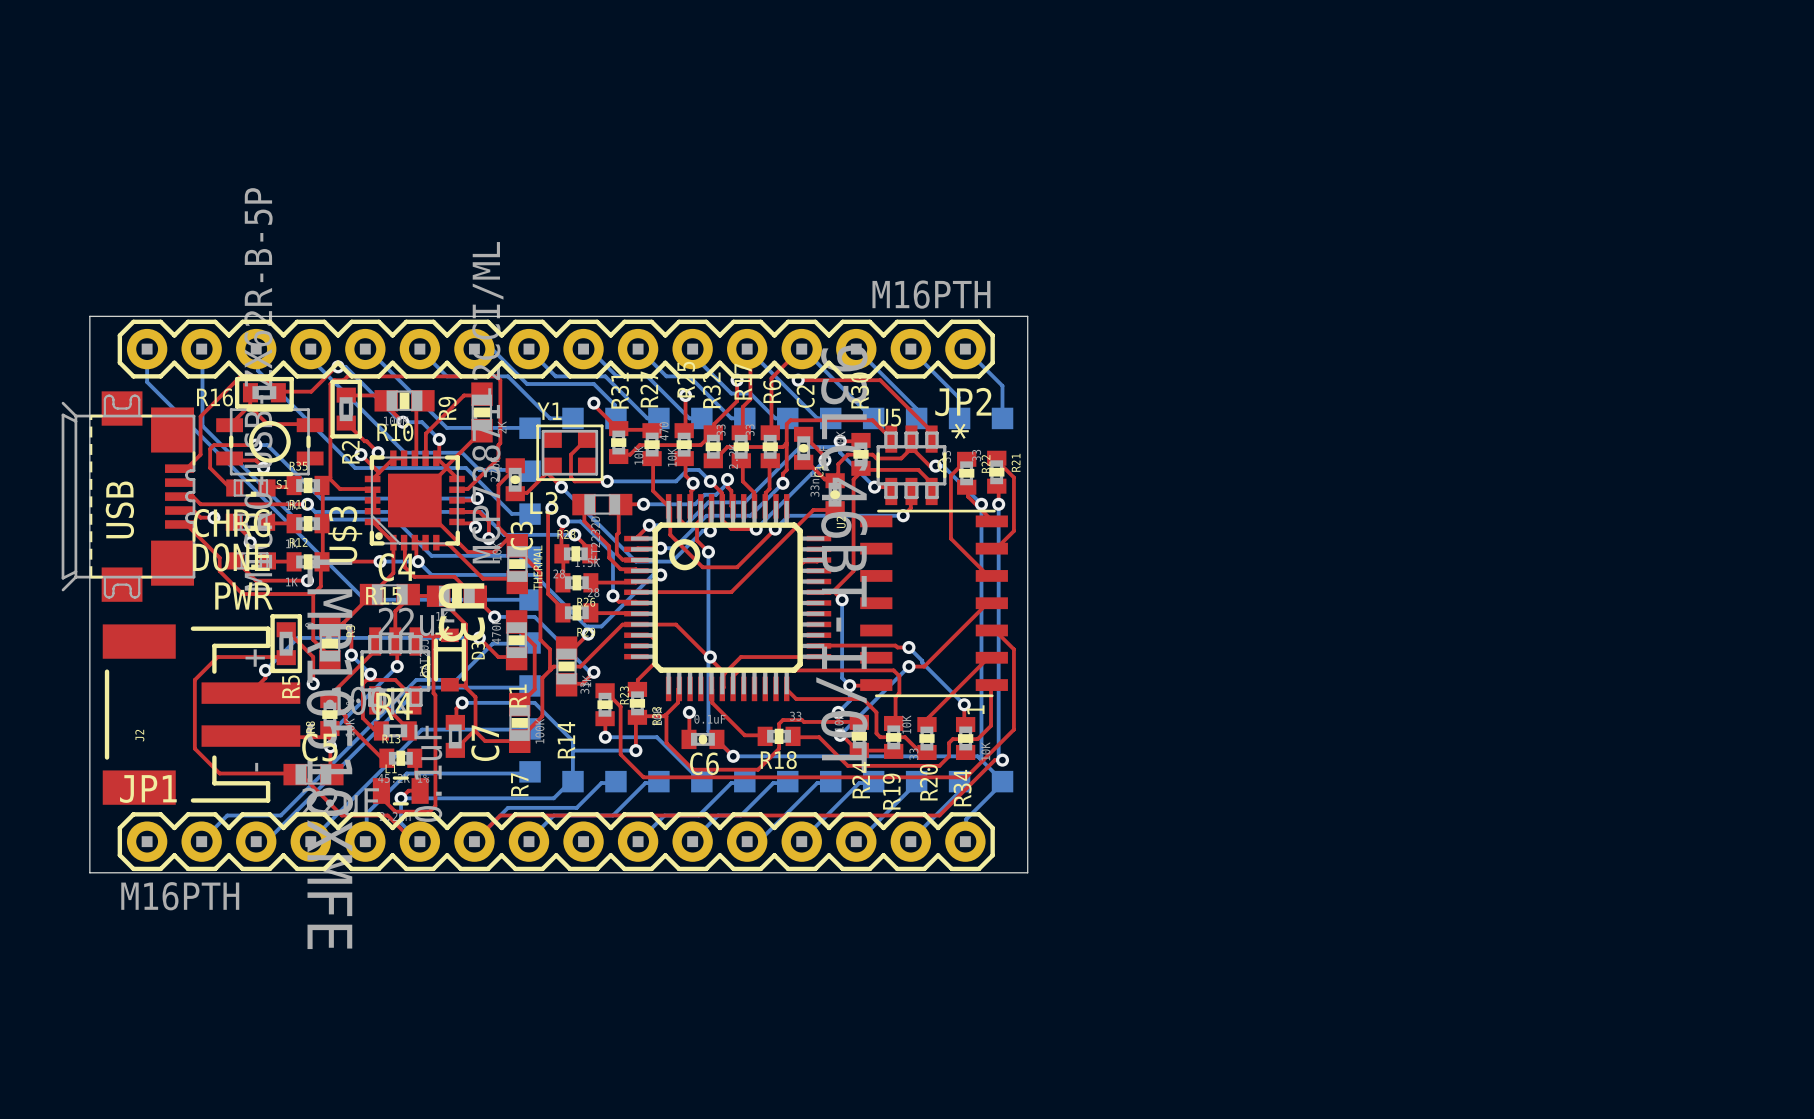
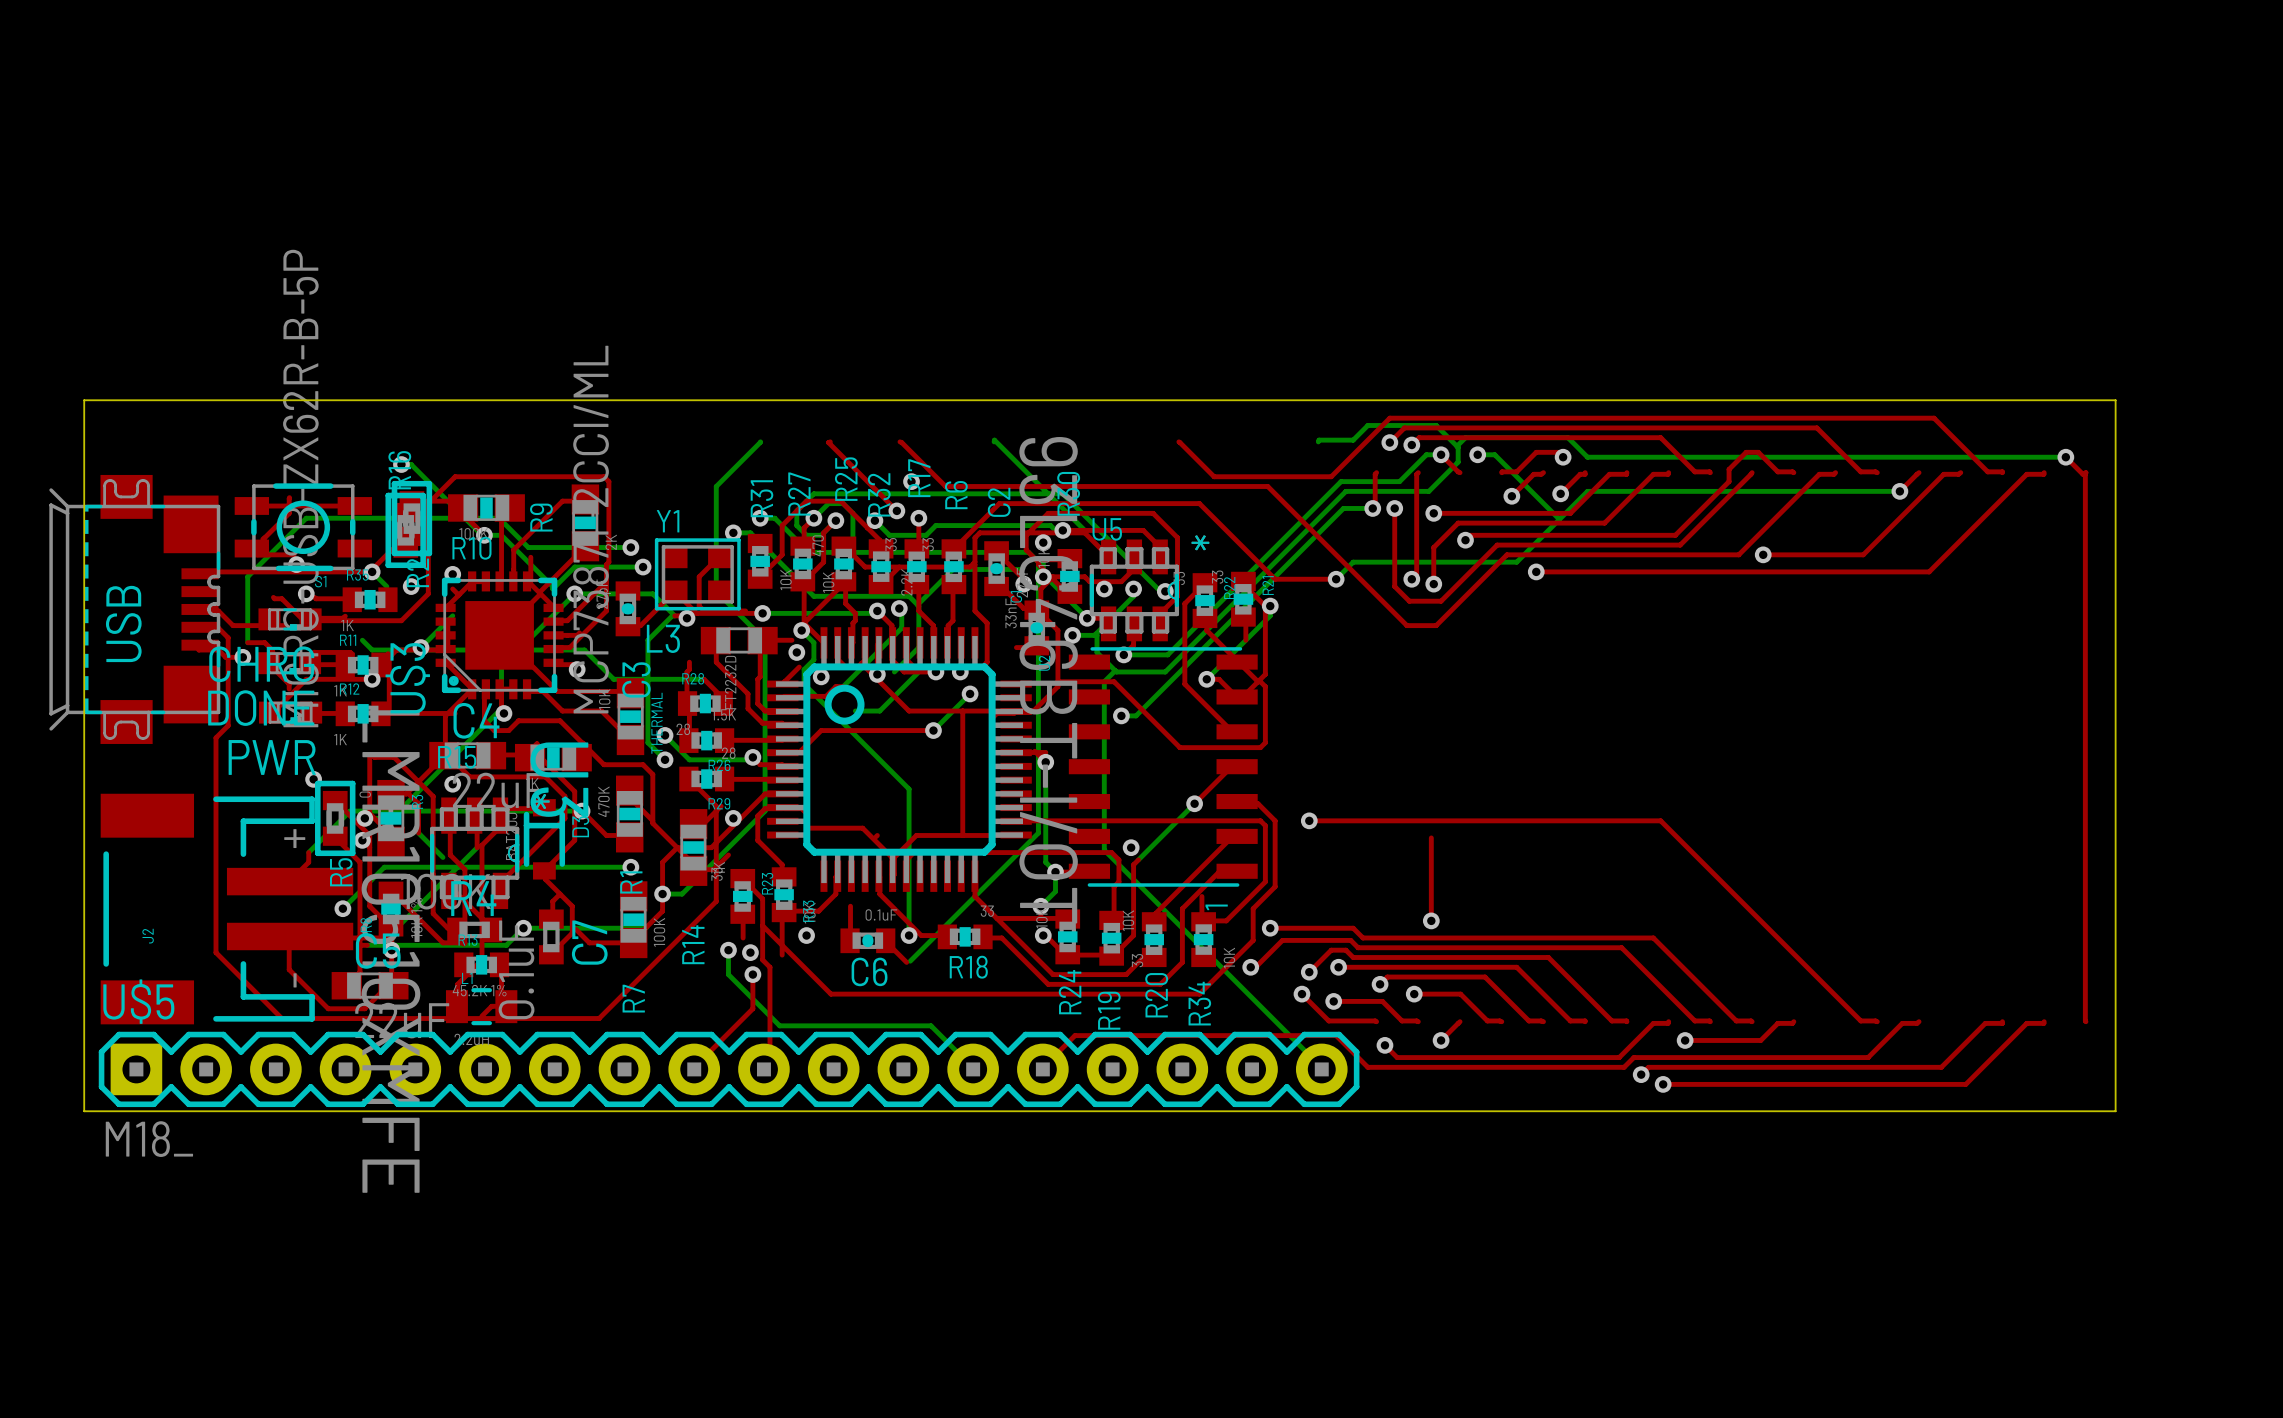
board edge: (89, 316) (1027, 316) (1027, 872) -> (84, 400) (2115, 400) (2115, 1111) (1282, 1111)
bottom track: (147, 349) (147, 382) (364, 599) (530, 600) -> none
bottom track: (201, 349) (202, 426) (296, 519) (395, 519) (431, 555) (530, 557) -> none
bottom track: (256, 349) (257, 349) (257, 370) (355, 468) (465, 468) (511, 513) (530, 514) -> none
bottom track: (310, 349) (311, 359) (404, 452) (462, 452) (479, 469) (530, 471) -> none
bottom track: (365, 349) (366, 347) (446, 427) (530, 428) -> none
bottom track: (419, 349) (446, 376) (507, 376) (549, 418) (572, 418) -> none
bottom track: (474, 349) (492, 349) (527, 384) (593, 384) (614, 405) (615, 418) -> none
bottom track: (528, 349) (555, 376) (605, 376) (647, 418) (658, 418) -> none
JP2: M16PTH (556, 349) -> none
bottom track: (583, 349) (590, 349) (616, 376) (647, 376) (689, 418) (701, 418) -> none
bottom track: none -> (760, 441) (716, 486) (716, 591) (765, 640) (765, 811) (682, 894) (662, 894)
bottom track: (638, 349) (666, 376) (689, 376) (731, 418) (744, 418) -> none
top track: none -> (830, 441) (828, 442) (896, 510)
bottom track: (692, 349) (693, 355) (731, 393) (750, 393) (775, 418) (787, 418) -> none
top track: none -> (900, 441) (945, 486) (1267, 486) (1406, 625) (1436, 625) (1506, 554) (1738, 554) (1819, 474) (1835, 472)
bottom track: (747, 349) (817, 418) (830, 418) -> none
top track: (747, 349) (750, 351) (750, 399) (742, 408) -> none
top track: (801, 349) (771, 378) (771, 431) -> (1336, 579) (1275, 579) (1199, 503) (999, 503) (955, 547)
bottom track: (856, 349) (916, 408) (916, 418) -> none
bottom track: (910, 349) (958, 397) (959, 418) -> none
top track: none -> (1178, 441) (1214, 476) (1331, 476) (1389, 418) (1934, 418) (1987, 471) (2002, 472)
bottom track: (965, 349) (1002, 385) (1002, 418) -> none
bottom track: none -> (1318, 441) (1319, 440) (1353, 440) (1367, 425) (1436, 425) (1458, 447) (1458, 462) (1428, 491) (1345, 491) (1165, 671) (1116, 671) (1096, 652) (1095, 634)
top track: none -> (1389, 442) (1404, 427) (1816, 427) (1860, 471) (1877, 472)
via: none -> (1389, 442)
top track: none -> (1411, 445) (1419, 437) (1660, 437) (1694, 471) (1710, 472)
via: none -> (1411, 445)
bottom track: none -> (1456, 446) (1465, 437) (1567, 437) (1587, 457) (2065, 457)
top track: none -> (1441, 454) (1460, 472)
via: none -> (1441, 454)
bottom track: none -> (1477, 454) (1494, 454) (1559, 519)
via: none -> (1477, 454)
top track: none -> (1563, 457) (1558, 452) (1536, 452) (1516, 471) (1501, 472)
via: none -> (1563, 457)
top track: none -> (2065, 457) (2082, 474) (2085, 472) (2085, 1021)
via: none -> (2065, 457)
top track: (338, 366) (311, 391) (278, 392) (261, 376) (240, 376) (200, 416) (200, 454) (187, 468) (179, 468) -> none
top track: none -> (1376, 472) (1375, 506) (1372, 508)
top track: none -> (1418, 472) (1416, 474) (1416, 574) (1411, 579)
top track: none -> (1543, 472) (1533, 474) (1511, 496)
top track: none -> (1585, 472) (1585, 474) (1580, 474) (1560, 493)
top track: none -> (1626, 472) (1626, 474) (1609, 474) (1570, 513) (1433, 513)
top track: none -> (1668, 472) (1668, 474) (1653, 474) (1604, 523) (1458, 523) (1433, 547) (1433, 584)
top track: none -> (1752, 472) (1680, 545) (1497, 545) (1441, 601) (1409, 601) (1394, 586) (1394, 508)
top track: none -> (1793, 472) (1777, 471) (1758, 452) (1746, 452) (1729, 469) (1729, 481) (1675, 535) (1470, 535) (1465, 540)
top track: none -> (1919, 472) (1899, 491)
top track: none -> (1960, 472) (1943, 474) (1863, 554) (1763, 554)
top track: none -> (2044, 472) (2043, 474) (2026, 474) (1929, 571) (1536, 571)
top track: (380, 376) (347, 376) (343, 380) (334, 380) (330, 384) (330, 477) (322, 485) (322, 559) (320, 563) (320, 586) (313, 594) (242, 594) (219, 571) (219, 557) (187, 525) (179, 524) -> (455, 476) (428, 503) (428, 593) (401, 620) (303, 620) (281, 598) (273, 597)
top track: (737, 380) (737, 401) (714, 424) (714, 431) (700, 445) (639, 445) (630, 454) (618, 454) -> (881, 548) (879, 540) (840, 501) (806, 501) (782, 525) (782, 554) (760, 576)
top track: (798, 380) (880, 380) (918, 418) -> (1062, 530) (1143, 530)
via: (798, 380) -> none
bottom track: none -> (1899, 491) (1587, 491) (1516, 562) (1353, 562) (1336, 579)
via: none -> (1899, 491)
via: none -> (1560, 493)
via: none -> (1511, 496)
R16 rotation: 0° (264, 392) -> 90° clockwise (405, 530)
R16 position: (264, 392) -> (405, 530)
top track: (685, 395) (684, 430) -> (899, 567) (865, 567) (843, 546)
via: (685, 395) -> none
top track: none -> (251, 505) (354, 505)
bottom track: none -> (1372, 508) (1343, 508) (1136, 715) (1121, 715)
via: none -> (1372, 508)
via: none -> (1394, 508)
top track: (593, 403) (618, 429) (652, 430) -> (813, 518) (804, 527) (802, 546)
via: (593, 403) -> none
via: none -> (896, 510)
top track: (249, 405) (267, 424) (310, 425) -> none
via: none -> (1433, 513)
bottom track: none -> (760, 518) (774, 518) (809, 552) (1028, 552) (1038, 562) (1038, 833) (910, 961)
via: none -> (760, 518)
bottom track: none -> (813, 518) (828, 503) (843, 503) (852, 513) (852, 552)
via: none -> (813, 518)
via: none -> (918, 518)
bottom track: none -> (835, 520) (821, 535) (806, 535) (796, 525) (796, 510) (813, 493) (1062, 493) (1158, 589)
top track: none -> (835, 520) (823, 532) (823, 562) (802, 581)
via: none -> (835, 520)
bottom track: none -> (874, 520) (889, 535) (926, 535) (935, 525) (1050, 525) (1055, 530) (1062, 530)
via: none -> (874, 520)
via: none -> (1062, 530)
via: none -> (733, 532)
bottom track: (416, 422) (422, 422) (439, 439) -> (501, 535) (552, 586) (552, 589) (574, 567) (643, 567)
top track: (346, 423) (378, 452) -> none
via: none -> (1465, 540)
via: none -> (1043, 542)
bottom track: none -> (630, 547) (528, 547) (499, 518) (306, 518) (247, 576) (247, 642)
via: none -> (630, 547)
top track: none -> (251, 548) (257, 554) (294, 554)
top track: none -> (405, 548) (391, 549) (369, 571) (201, 571) (200, 573)
via: none -> (1763, 554)
via: (439, 439) -> none
top track: (911, 439) (910, 450) (914, 450) (929, 466) (935, 466) -> none
S1 position: (269, 441) -> (303, 527)
via: (840, 441) -> none
bottom track: (255, 445) (267, 445) (320, 498) (477, 498) -> none
top track: (255, 445) (213, 445) (210, 448) (210, 468) (229, 487) (234, 487) -> none
via: none -> (643, 567)
bottom track: (840, 447) (800, 447) (744, 502) (708, 502) (685, 525) (649, 525) -> none
bottom track: none -> (1021, 569) (953, 569) (917, 604)
bottom track: none -> (372, 571) (386, 586)
via: none -> (372, 571)
via: none -> (1536, 571)
top track: (360, 454) (379, 472) -> none
via position: (360, 454) -> (411, 586)
via: none -> (1043, 576)
via: none -> (1336, 579)
via: none -> (1411, 579)
top track: (229, 458) (231, 460) (255, 460) (263, 468) -> none
top track: none -> (843, 581) (801, 625) (801, 630)
bottom track: (824, 460) (756, 529) -> none
via: none -> (1433, 584)
top track: none -> (452, 589) (458, 595)
via: none -> (1104, 589)
bottom track: none -> (1133, 589) (1133, 596) (1094, 635) (1072, 635)
via: none -> (1133, 589)
top track: (515, 465) (513, 469) (498, 485) (498, 527) (515, 544) -> (557, 691) (628, 691)
top track: none -> (675, 591) (696, 613) (762, 613)
bottom track: (935, 466) (943, 466) (981, 504) (980, 759) -> none
via: none -> (574, 593)
bottom track: (687, 469) (676, 481) (607, 481) -> (848, 596) (813, 596) (750, 532) (733, 532)
bottom track: (698, 469) (710, 481) -> (862, 596) (909, 596) (918, 606) (918, 647) (894, 671)
top track: (786, 469) (782, 473) (782, 483) -> (974, 596) (974, 610) (987, 623) (987, 662) (982, 667) (913, 667) (906, 659) (906, 642)
top track: none -> (314, 597) (352, 599)
bottom track: none -> (1270, 606) (1270, 615) (1206, 679)
via: none -> (1270, 606)
top track: (329, 478) (339, 489) (372, 489) -> none
bottom track: (727, 479) (727, 483) (716, 494) (704, 494) (695, 504) (643, 504) -> none
top track: (727, 479) (727, 487) (731, 490) (731, 506) (733, 506) -> none
top track: none -> (200, 609) (218, 610) (233, 625) (284, 625)
top track: none -> (1036, 610) (1057, 630) (1057, 686) (1033, 711) (909, 711) (861, 663)
via position: (607, 481) -> (762, 613)
bottom track: none -> (762, 613) (877, 613)
via: (693, 483) -> none
bottom track: none -> (901, 613) (901, 628) (843, 686)
bottom track: (782, 483) (750, 515) (706, 515) (674, 548) (660, 548) -> none
via: (782, 483) -> none
R35 position: (308, 485) -> (370, 599)
bottom track: none -> (452, 615) (420, 647)
top track: none -> (674, 615) (684, 615)
top track: (559, 485) (548, 473) (552, 466) (525, 492) -> (674, 591) (640, 625)
bottom track: (561, 487) (635, 561) (672, 561) (702, 531) (710, 531) -> none
top track: (931, 491) (929, 490) (929, 481) (918, 469) (861, 469) (860, 468) (861, 471) (853, 479) (853, 571) (832, 592) -> (1160, 623) (1160, 613) (1177, 596) (1177, 537) (1153, 513) (1048, 513) (1026, 535) (1026, 549) (1038, 562) (1038, 564) (1069, 594)
USB position: (128, 496) -> (134, 609)
top track: (179, 496) (192, 496) (200, 504) (307, 504) -> none
bottom track: none -> (801, 630) (813, 642) (813, 659) (804, 669) (804, 684) (909, 789) (909, 935)
via: none -> (801, 630)
via: (477, 498) -> none
via: none -> (1072, 635)
via: (307, 504) -> none
via: (643, 504) -> none
via: (981, 504) -> none
bottom track: (998, 504) (998, 756) (1002, 760) -> none
via: (998, 504) -> none
top track: none -> (247, 642) (264, 642) (272, 652)
top track: (668, 506) (670, 508) (670, 534) (702, 567) (737, 567) (775, 529) -> none
top track: (551, 508) (548, 511) (548, 594) (561, 607) (562, 612) -> (200, 627) (218, 628) (228, 637) (228, 725) (215, 737) (215, 952) (281, 1018) (599, 1018) (716, 901) (716, 806) (688, 779)
via: (551, 508) -> none
via: none -> (420, 647)
top track: (819, 510) (813, 510) (731, 592) (649, 592) -> (933, 730) (821, 730) (799, 752)
top track: none -> (445, 649) (396, 650) (391, 654) (387, 654) (387, 713)
top track: (457, 511) (479, 511) (488, 521) (488, 538) -> (553, 649) (569, 647) (606, 610) (606, 581)
top track: none -> (314, 652) (352, 654)
via: none -> (796, 652)
bottom track: (903, 515) (788, 515) (775, 529) -> (1123, 654) (1167, 654) (1341, 481) (1399, 481) (1426, 454) (1441, 454)
bottom track: (563, 521) (580, 521) (612, 553) (612, 595) -> none
via: (563, 521) -> none
top track: none -> (1237, 662) (1265, 686) (1265, 742) (1260, 747) (1179, 747) (1114, 681) (1057, 681)
top track: (696, 524) (697, 540) (708, 552) -> none
via: (649, 525) -> none
bottom track: none -> (1115, 670) (1104, 681) (1104, 850) (1321, 1069)
bottom track: none -> (918, 671) (879, 711) (855, 711)
via: none -> (821, 676)
top track: none -> (372, 679) (306, 679) (274, 712)
via: none -> (372, 679)
via: (574, 534) -> none
top track: none -> (1206, 679) (1219, 679) (1237, 696)
via: none -> (1206, 679)
via: (488, 538) -> none
top track: none -> (843, 686) (835, 686) (826, 696) (813, 696)
via: (250, 542) -> none
top track: (393, 542) (393, 573) (372, 594) -> (472, 689) (445, 715) (445, 754)
top track: (404, 542) (404, 567) (414, 576) (454, 576) (494, 616) -> (485, 689) (484, 720) (494, 730) (508, 730) (518, 720) (560, 720) (604, 764) (643, 764) (652, 774) (652, 820)
top track: (460, 544) (467, 552) (494, 552) (507, 538) (517, 545) (517, 550) (540, 573) (540, 639) (549, 649) (550, 669) -> none
bottom track: none -> (970, 693) (933, 730)
via: none -> (970, 693)
via: (660, 548) -> none
bottom track: (708, 552) (708, 731) (733, 756) (977, 756) (1002, 783) (966, 819) (965, 841) -> none
via: (708, 552) -> none
bottom track: none -> (501, 708) (391, 818) (364, 818)
top track: (464, 559) (483, 578) (513, 578) -> (562, 711) (601, 711) (625, 735)
top track: none -> (962, 711) (962, 835)
top track: (235, 560) (255, 580) (307, 580) -> none
bottom track: (380, 561) (418, 561) (431, 574) (534, 574) (588, 628) (588, 634) -> none
via: (380, 561) -> none
bottom track: none -> (501, 713) (501, 667) (574, 593) (652, 593) (674, 615) (672, 615) (647, 640) (647, 742) (665, 759)
via: none -> (1121, 715)
bottom track: (660, 574) (653, 574) (601, 626) (587, 627) -> none
via: (660, 574) -> none
via: none -> (933, 730)
bottom track: none -> (665, 735) (689, 759) (748, 759)
via: none -> (665, 735)
via: (307, 580) -> none
top track: none -> (1033, 752) (1045, 752)
top track: none -> (491, 755) (525, 754) (537, 743) (533, 750) (574, 791) (574, 840) (544, 870)
via: none -> (665, 759)
part: (766, 600) -> none
via: none -> (313, 779)
via: none -> (452, 784)
bottom track: (494, 616) (534, 616) (590, 672) (593, 672) -> none
via: (494, 616) -> none
top track: (649, 624) (676, 624) (724, 673) -> none
top track: (465, 626) (438, 596) (408, 594) (408, 597) (395, 611) (395, 632) -> (564, 796) (545, 776) (469, 776) (447, 754) (444, 755)
bottom track: none -> (1194, 803) (1138, 859)
top track: (958, 632) (924, 666) (908, 666) -> none
via: none -> (1194, 803)
top track: (996, 632) (1010, 645) -> (1243, 803) (1258, 803) (1275, 820) (1275, 886) (1253, 908) (1253, 940)
via position: (588, 634) -> (733, 818)
top track: (433, 636) (435, 805) (429, 811) (395, 811) (381, 798) (381, 790) -> none
top track: (375, 641) (374, 651) (330, 695) (329, 700) -> (448, 815) (450, 855) (464, 869) (464, 942) (442, 942) (411, 911)
top track: none -> (500, 815) (499, 828) (482, 845) (482, 959) (457, 984) (456, 992)
bottom track: (530, 642) (492, 643) (456, 679) (416, 679) (280, 815) (227, 815) (201, 841) -> none
via: none -> (364, 818)
top track: (465, 643) (465, 686) -> (564, 818) (501, 881) (500, 890)
top track: (895, 645) (897, 647) (908, 647) -> (1114, 820) (1260, 820)
top track: none -> (1309, 820) (1660, 820) (1860, 1020) (1877, 1021)
via: none -> (1309, 820)
top track: (534, 647) (534, 689) (521, 702) -> (652, 823) (691, 862) (693, 870)
bottom track: (908, 647) (964, 704) -> none
via: (908, 647) -> none
top track: none -> (806, 828) (862, 828) (891, 857) (892, 876)
via: (351, 655) -> none
top track: (286, 657) (217, 657) (194, 679) (194, 748) (219, 773) (294, 773) (301, 775) (341, 815) (387, 815) (412, 840) (419, 841) -> (335, 836) (359, 862) (359, 972) (346, 985)
via: (710, 657) -> none
top track: none -> (1431, 837) (1431, 920)
via: none -> (362, 840)
top track: (655, 662) (637, 679) (637, 689) -> (782, 807) (765, 808) (757, 815) (757, 840) (782, 864) (782, 874) (784, 876)
via: (397, 666) -> none
bottom track: (908, 666) (840, 735) -> none
via: (265, 670) -> none
via: (593, 672) -> none
via: (370, 674) -> none
top track: none -> (1138, 859) (1133, 864) (1133, 935) (1111, 956)
bottom track: none -> (630, 867) (384, 867) (342, 908)
via: none -> (630, 867)
top track: none -> (369, 869) (369, 906) (391, 926)
via: (313, 683) -> none
top track: (362, 683) (366, 679) (395, 679) (415, 700) -> (433, 869) (433, 796) (394, 757) (374, 757) (373, 755)
top track: (450, 685) (464, 685) (475, 697) (475, 729) (471, 733) -> (545, 872) (545, 879) (572, 906) (572, 933)
bottom track: (530, 685) (528, 687) (420, 687) (267, 840) (256, 841) -> none
top track: (991, 685) (991, 725) (977, 739) (952, 739) (949, 742) -> (1236, 872) (1219, 872) (1182, 908) (1182, 945)
top track: (786, 689) (796, 699) (863, 699) (876, 712) (876, 733) (880, 737) (905, 737) (918, 750) (926, 750) (926, 752) -> none
top track: (1013, 693) (1013, 729) (1004, 739) -> (1265, 881) (1226, 920) (1203, 921)
bottom track: (462, 702) (534, 702) (572, 741) (572, 781) (570, 781) (553, 798) (401, 798) (401, 823) (419, 841) -> none
via: (462, 702) -> none
via: none -> (662, 894)
via: (964, 704) -> none
via: (689, 712) -> none
via: none -> (342, 908)
top track: (665, 715) (666, 742) (693, 769) (758, 769) (779, 748) (779, 723) (782, 720) (802, 720) -> (974, 876) (974, 896) (994, 916)
top track: (345, 716) (345, 721) (381, 758) (386, 758) -> none
via: none -> (1431, 920)
bottom track: (433, 729) (422, 729) (310, 841) -> (523, 928) (506, 945) (367, 945)
via: none -> (523, 928)
top track: none -> (1270, 928) (1353, 928) (1362, 937) (1653, 937) (1736, 1020) (1752, 1021)
via: none -> (1270, 928)
via: none -> (806, 935)
top track: none -> (288, 936) (289, 969) (328, 1008) (364, 1008) (389, 984) (393, 985)
bottom track: (605, 737) (656, 737) (701, 781) -> none
via: (605, 737) -> none
top track: (807, 737) (819, 737) -> (996, 918) (1016, 937)
top track: none -> (1001, 937) (1048, 984) (1160, 984) (1170, 974)
top track: none -> (359, 945) (367, 945)
bottom track: none -> (728, 950) (728, 974) (779, 1025) (931, 1025) (973, 1069)
via: none -> (728, 950)
via: none -> (750, 952)
bottom track: (572, 750) (635, 750) -> none
via: (635, 750) -> none
via position: (733, 756) -> (909, 935)
top track: (626, 760) (643, 777) (966, 777) -> (762, 925) (830, 994) (1199, 994) (1204, 989)
top track: none -> (769, 967) (769, 1062) (763, 1069)
top track: (1002, 760) (994, 760) (939, 815) (500, 815) (474, 841) -> none
top track: none -> (1338, 967) (1516, 967) (1570, 1020) (1585, 1021)
via: none -> (1338, 967)
top track: none -> (1248, 969) (1253, 969) (1282, 940) (1350, 940) (1358, 947) (1621, 947) (1694, 1020) (1710, 1021)
top track: none -> (1309, 972) (1331, 950) (1345, 950) (1353, 957) (1548, 957) (1611, 1020) (1626, 1021)
via: none -> (1309, 972)
top track: none -> (752, 974) (752, 1008) (694, 1069)
via: none -> (752, 974)
top track: (905, 765) (939, 765) -> (1126, 974) (1143, 957) (1154, 957)
bottom track: (530, 771) (528, 773) (406, 773) (366, 813) (365, 841) -> none
top track: none -> (1380, 984) (1387, 977) (1485, 977) (1528, 1020) (1543, 1021)
via: none -> (1380, 984)
bottom track: (615, 781) (601, 783) (576, 807) (507, 807) (474, 841) -> none
bottom track: (658, 781) (645, 783) (612, 815) (553, 815) (528, 841) -> none
bottom track: (744, 781) (731, 783) (698, 815) (664, 815) (638, 841) -> none
bottom track: (787, 781) (773, 783) (740, 815) (718, 815) (692, 841) -> none
bottom track: (830, 781) (817, 783) (760, 840) (747, 841) -> none
bottom track: (873, 781) (859, 783) (801, 841) -> none
bottom track: (916, 781) (856, 841) -> none
bottom track: (959, 781) (958, 792) (910, 841) -> none
top track: none -> (1301, 994) (1328, 1020) (1376, 1021)
via: none -> (1301, 994)
top track: none -> (1414, 994) (1460, 994) (1487, 1020) (1501, 1021)
via: none -> (1414, 994)
top track: none -> (1333, 1001) (1382, 1001) (1402, 1020) (1418, 1021)
via: none -> (1333, 1001)
via: (401, 798) -> none
top track: none -> (1460, 1021) (1441, 1040)
top track: none -> (1668, 1021) (1668, 1023) (1653, 1023) (1619, 1057) (1397, 1057) (1384, 1045)
top track: none -> (1793, 1021) (1792, 1023) (1777, 1023) (1760, 1040) (1685, 1040)
top track: none -> (1919, 1021) (1902, 1023) (1868, 1057) (1633, 1057) (1624, 1067) (1367, 1067) (1336, 1035) (1075, 1035) (1042, 1069)
top track: none -> (2002, 1021) (2002, 1023) (1985, 1023) (1941, 1067) (1648, 1067) (1641, 1074)
top track: none -> (2044, 1021) (2043, 1023) (2026, 1023) (1965, 1084) (1663, 1084)
via: none -> (1441, 1040)
via: none -> (1685, 1040)
via: none -> (1384, 1045)
U$5: none -> M18_ (729, 1069)
JP1: M16PTH (556, 841) -> none
via: none -> (1641, 1074)
via: none -> (1663, 1084)

